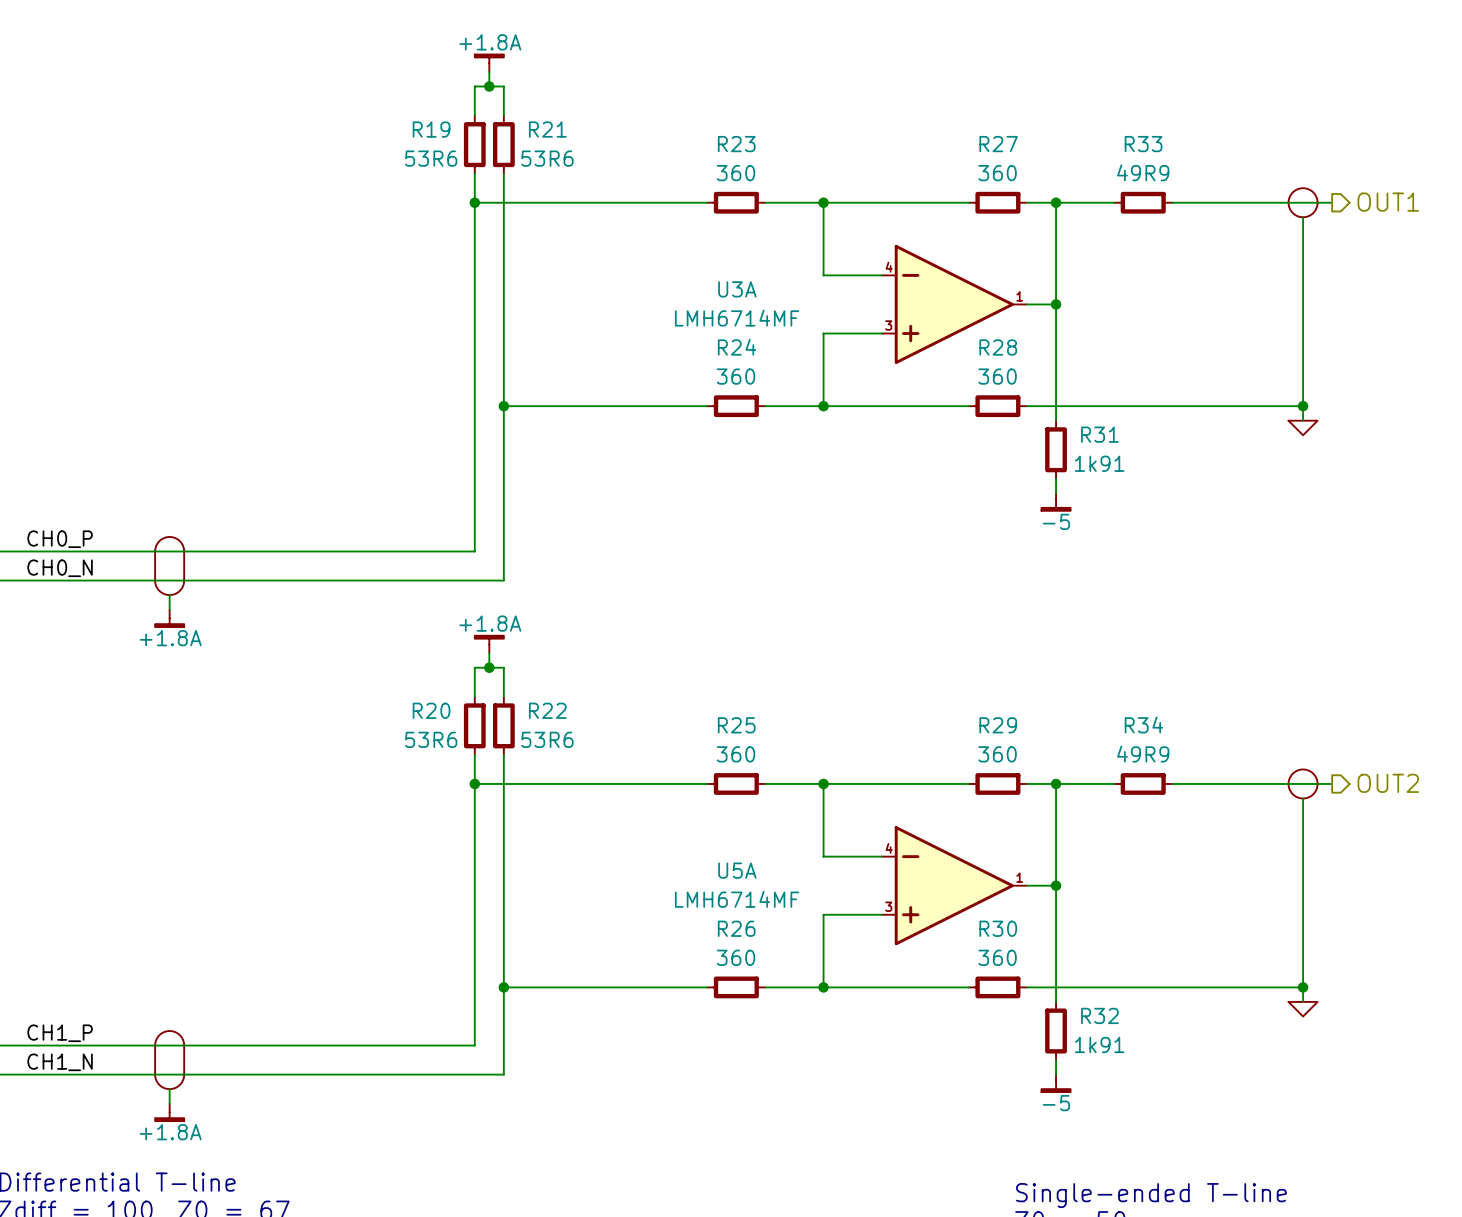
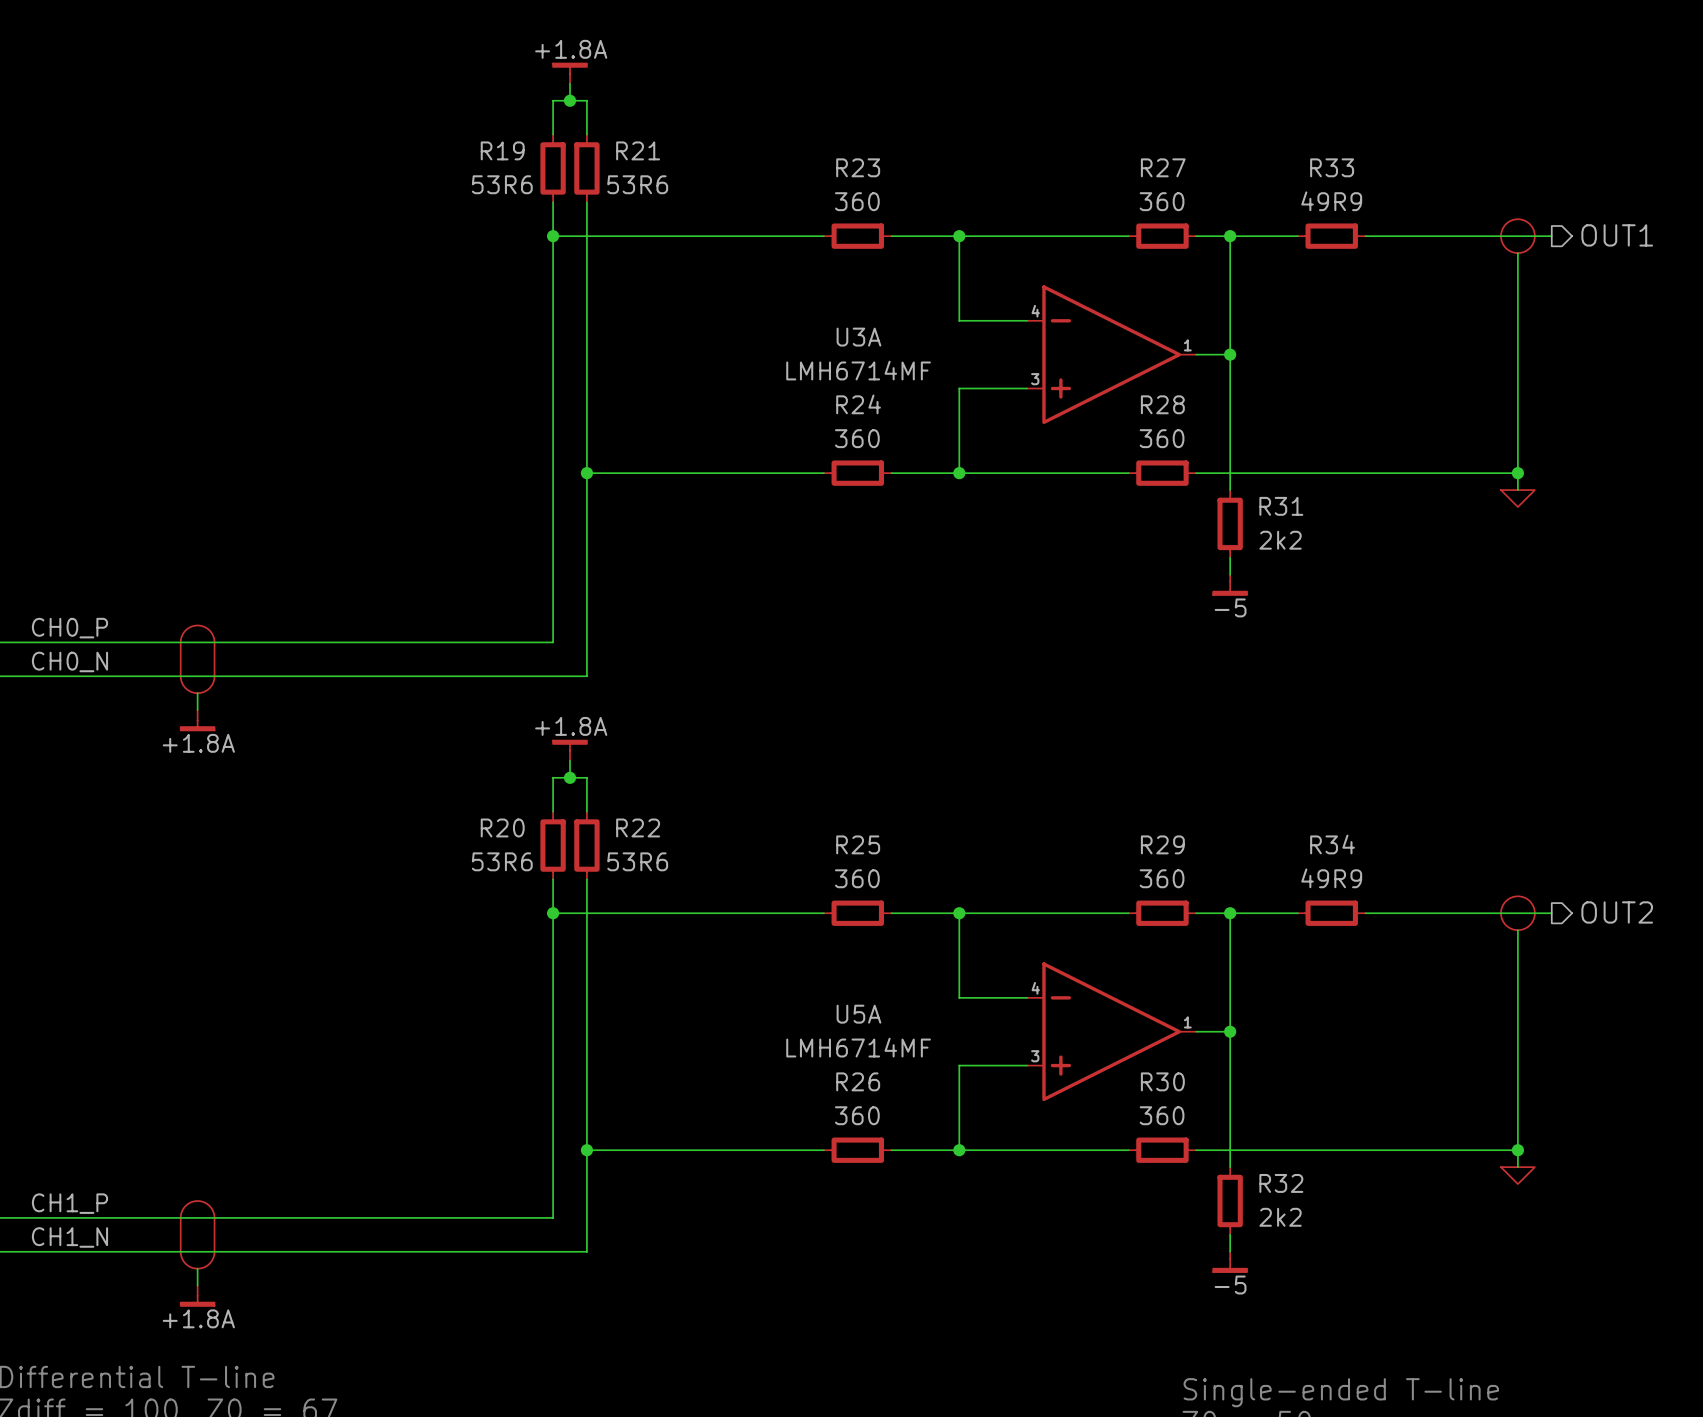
R31 value: 1k91 (1099, 463) -> 2k2 (1280, 540)
R32 value: 1k91 (1099, 1044) -> 2k2 (1280, 1217)

